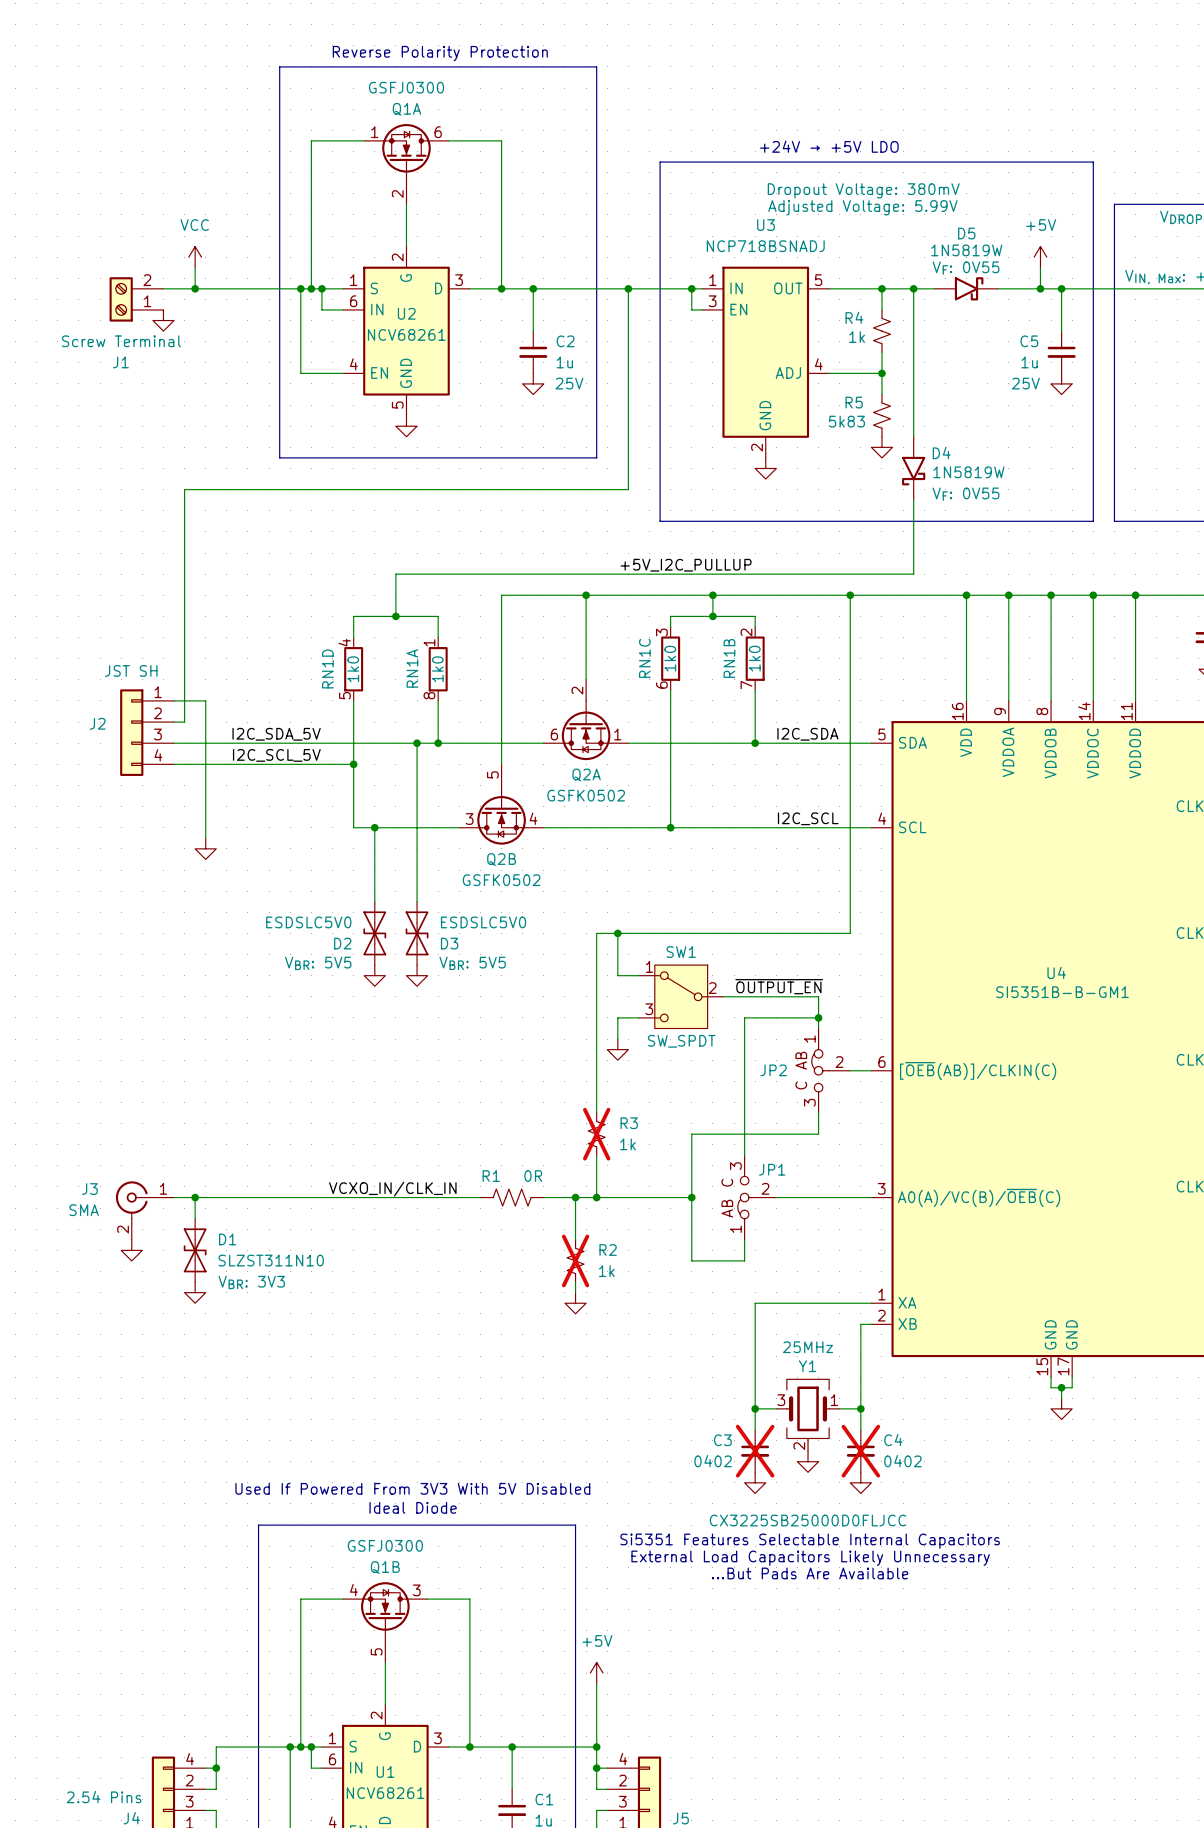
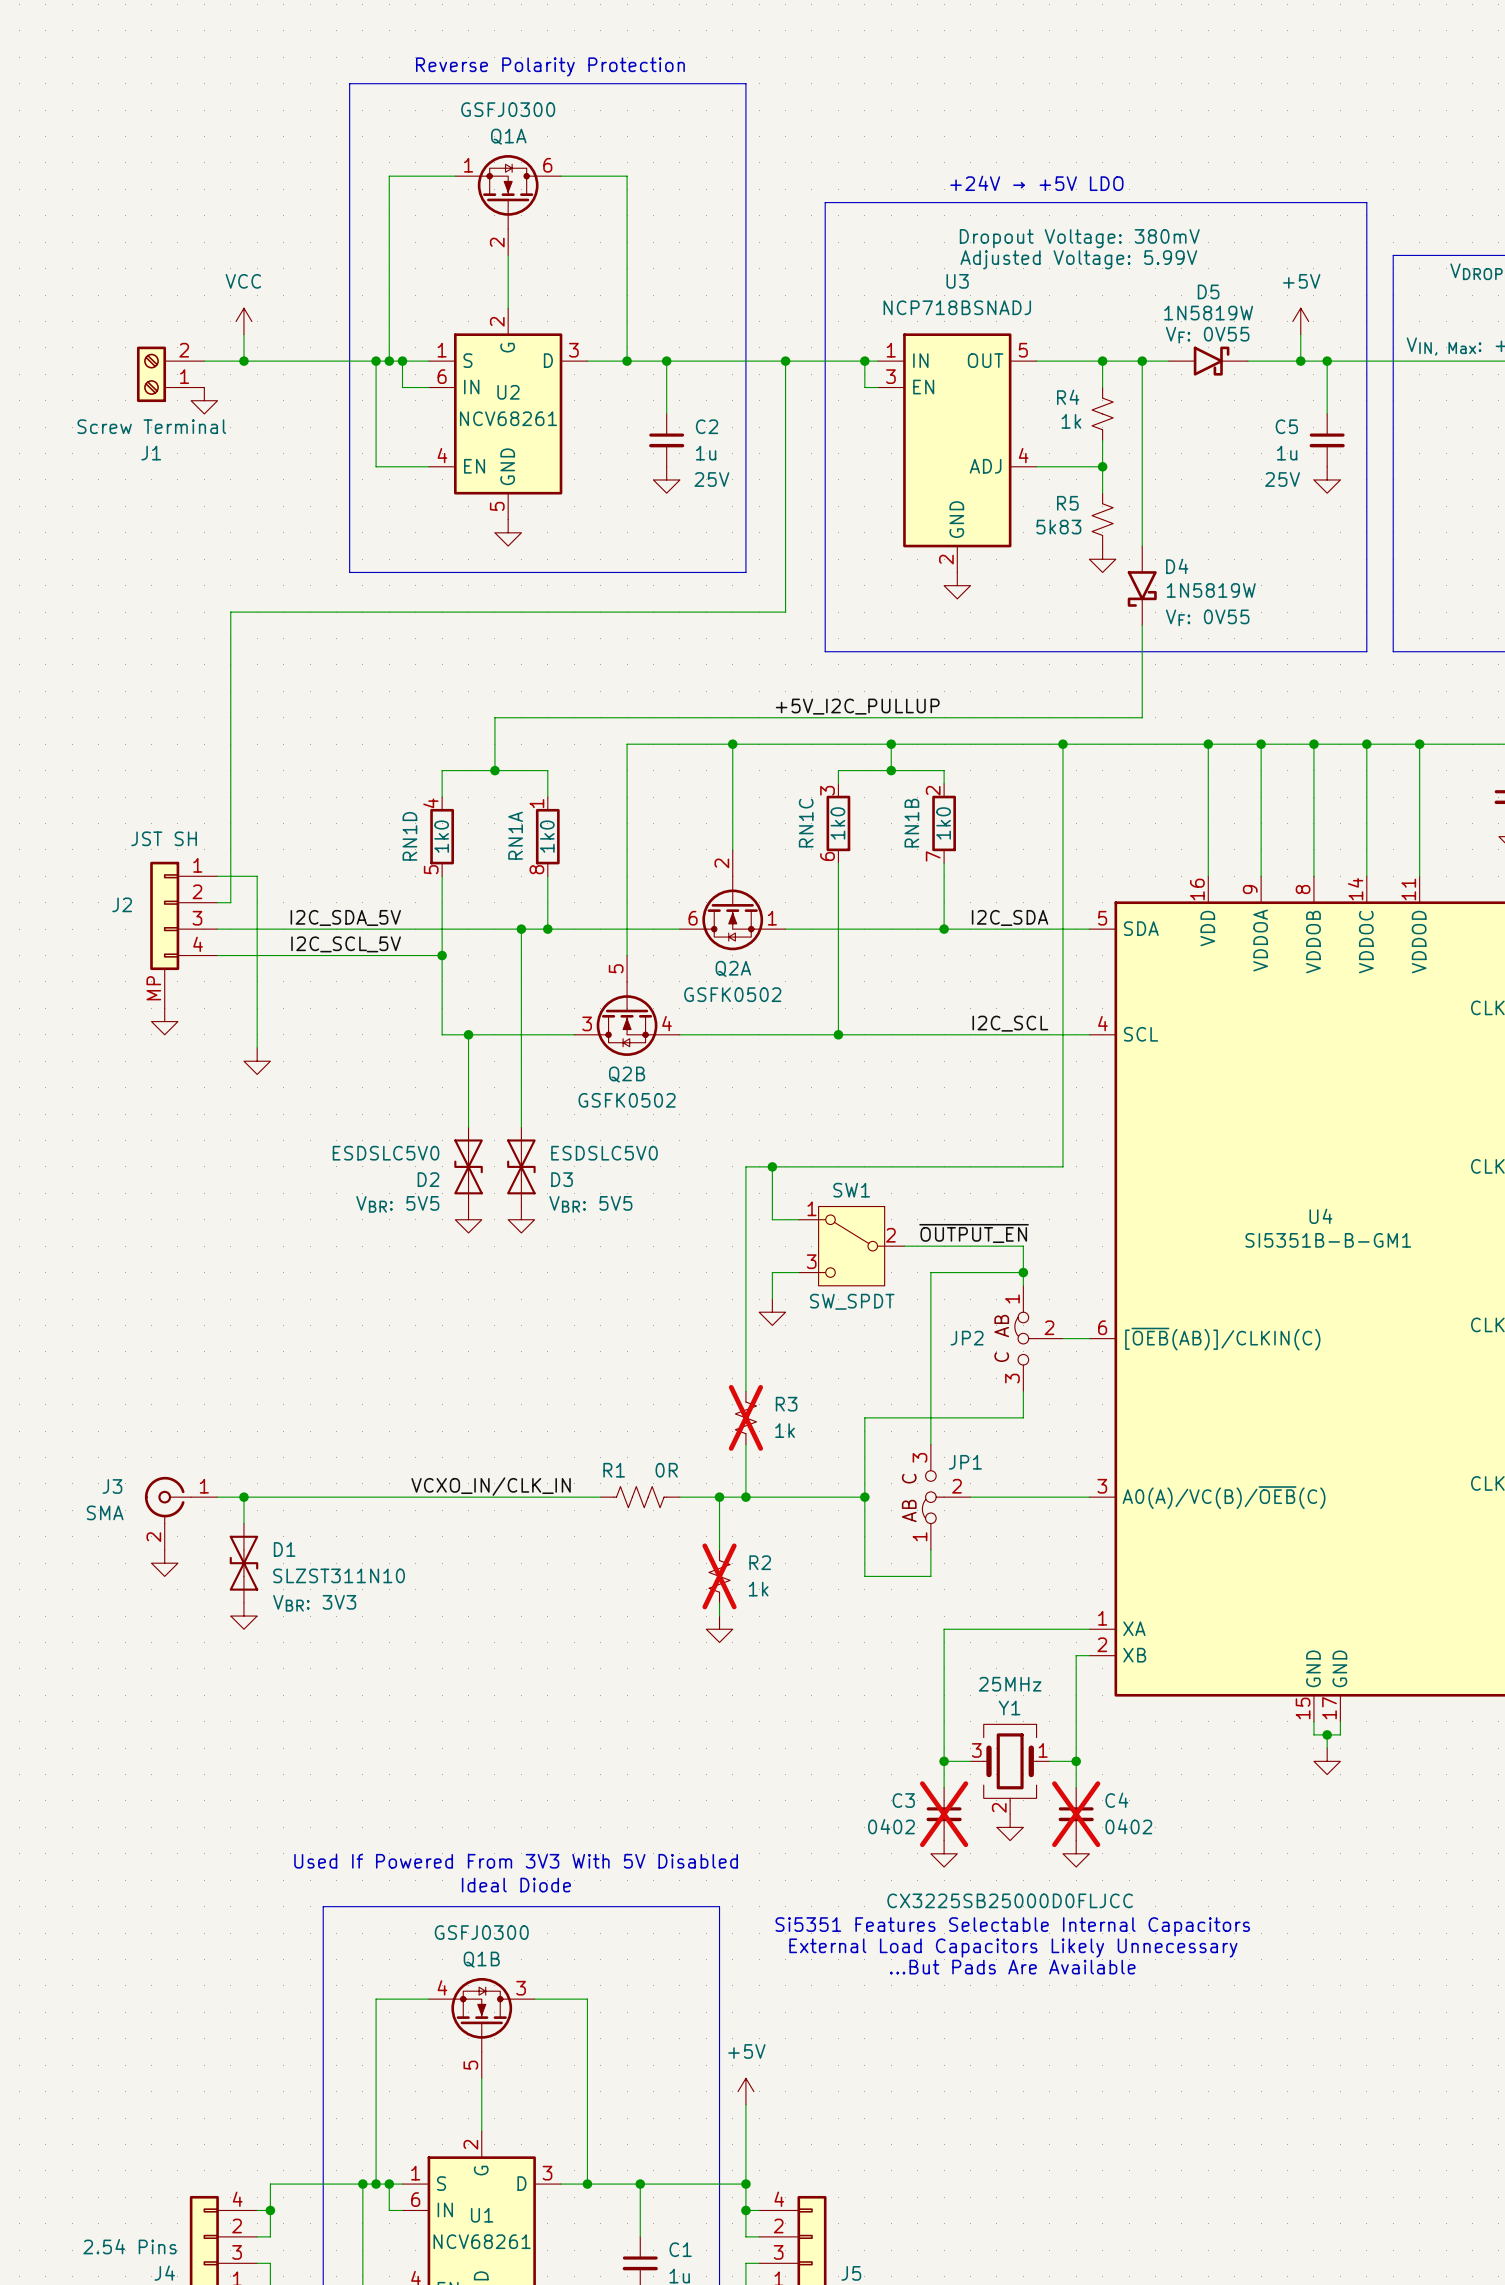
J2 symbol: [120, 689, 175, 776] -> [150, 861, 218, 1009]
power symbol: none -> (164, 1021)

